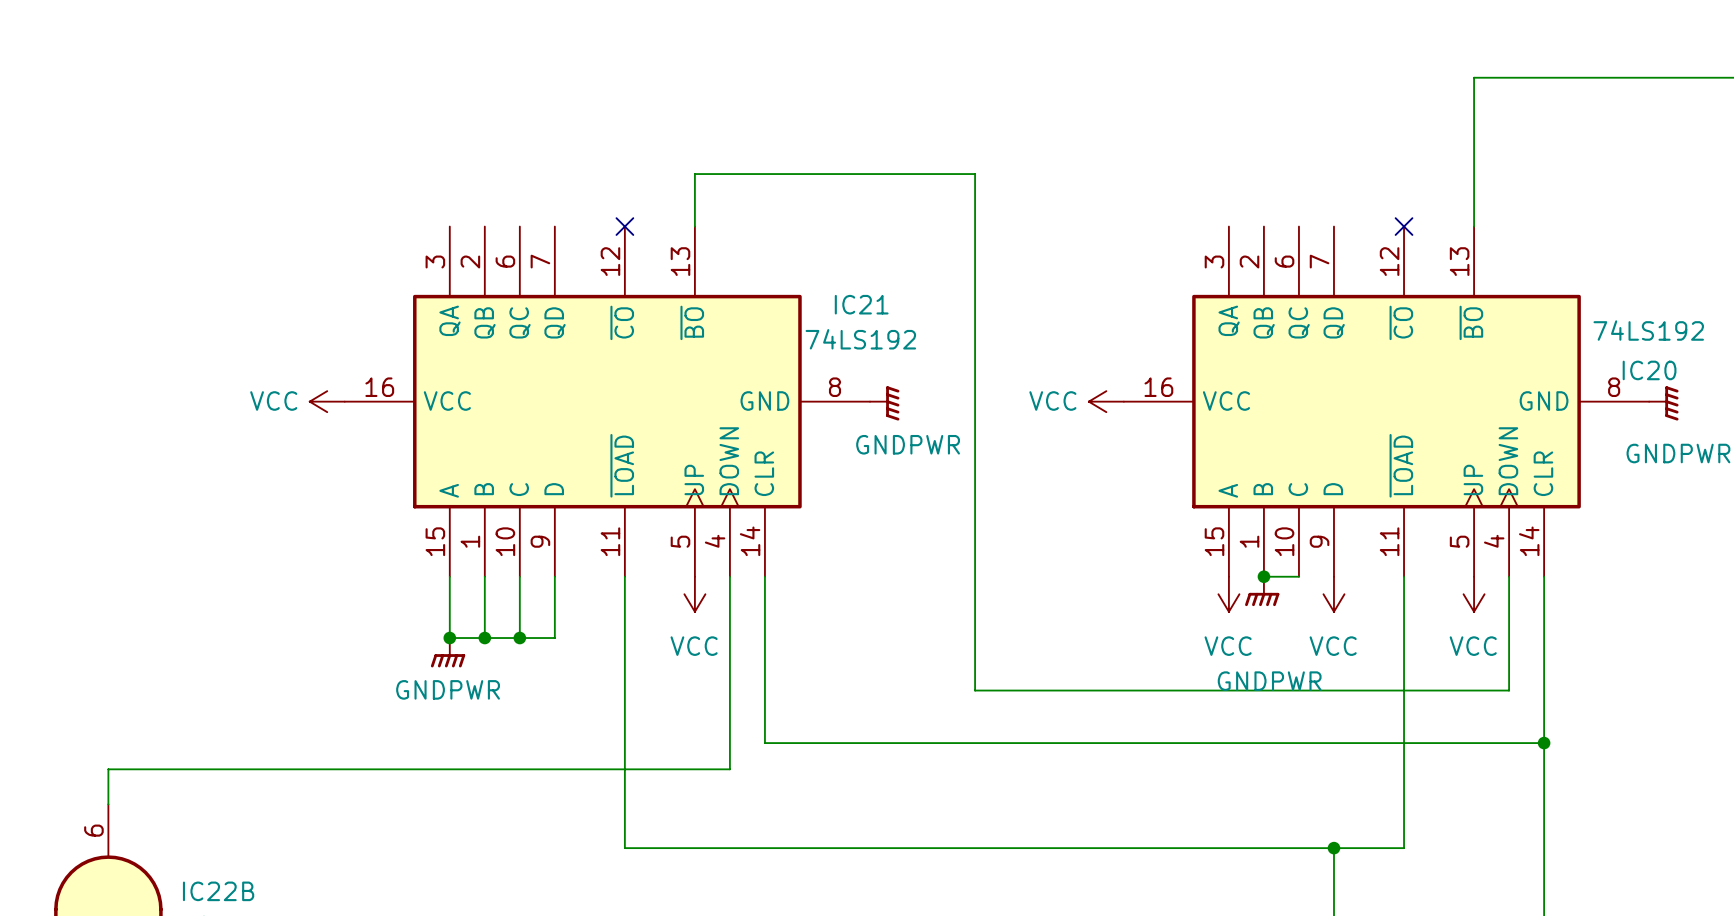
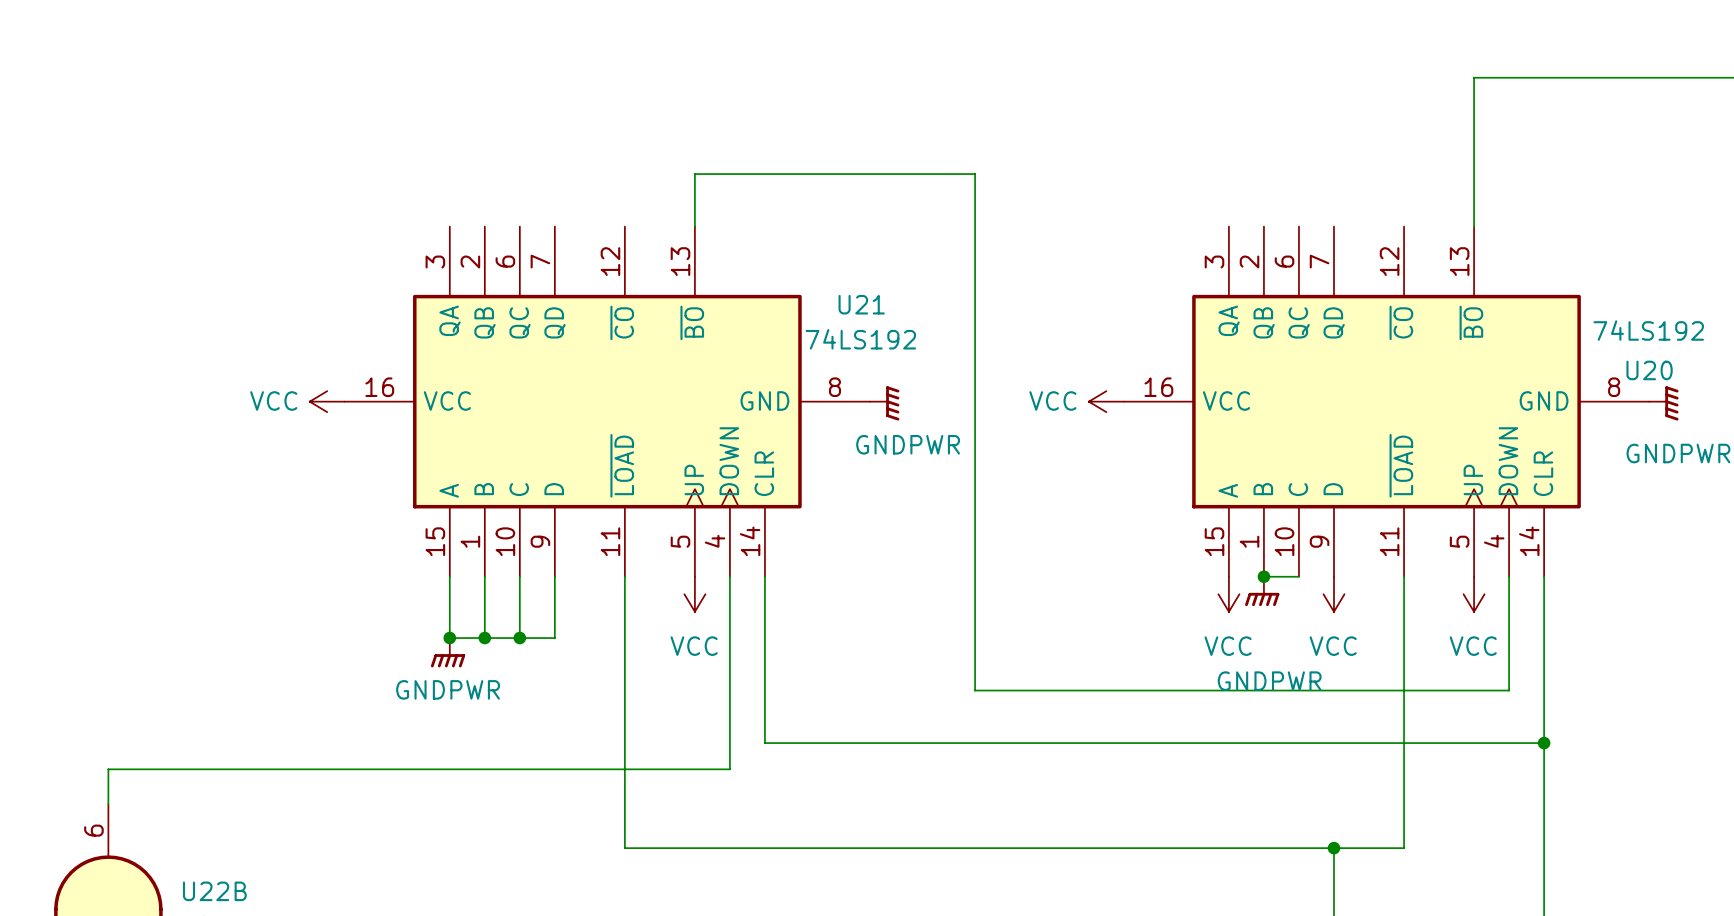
no-connect mark: (624, 226) -> none
no-connect mark: (1404, 226) -> none
IC21 name: IC21 (861, 304) -> U21 (861, 304)
IC20 name: IC20 (1649, 370) -> U20 (1649, 370)
IC22B name: IC22B (218, 891) -> U22B (214, 891)

